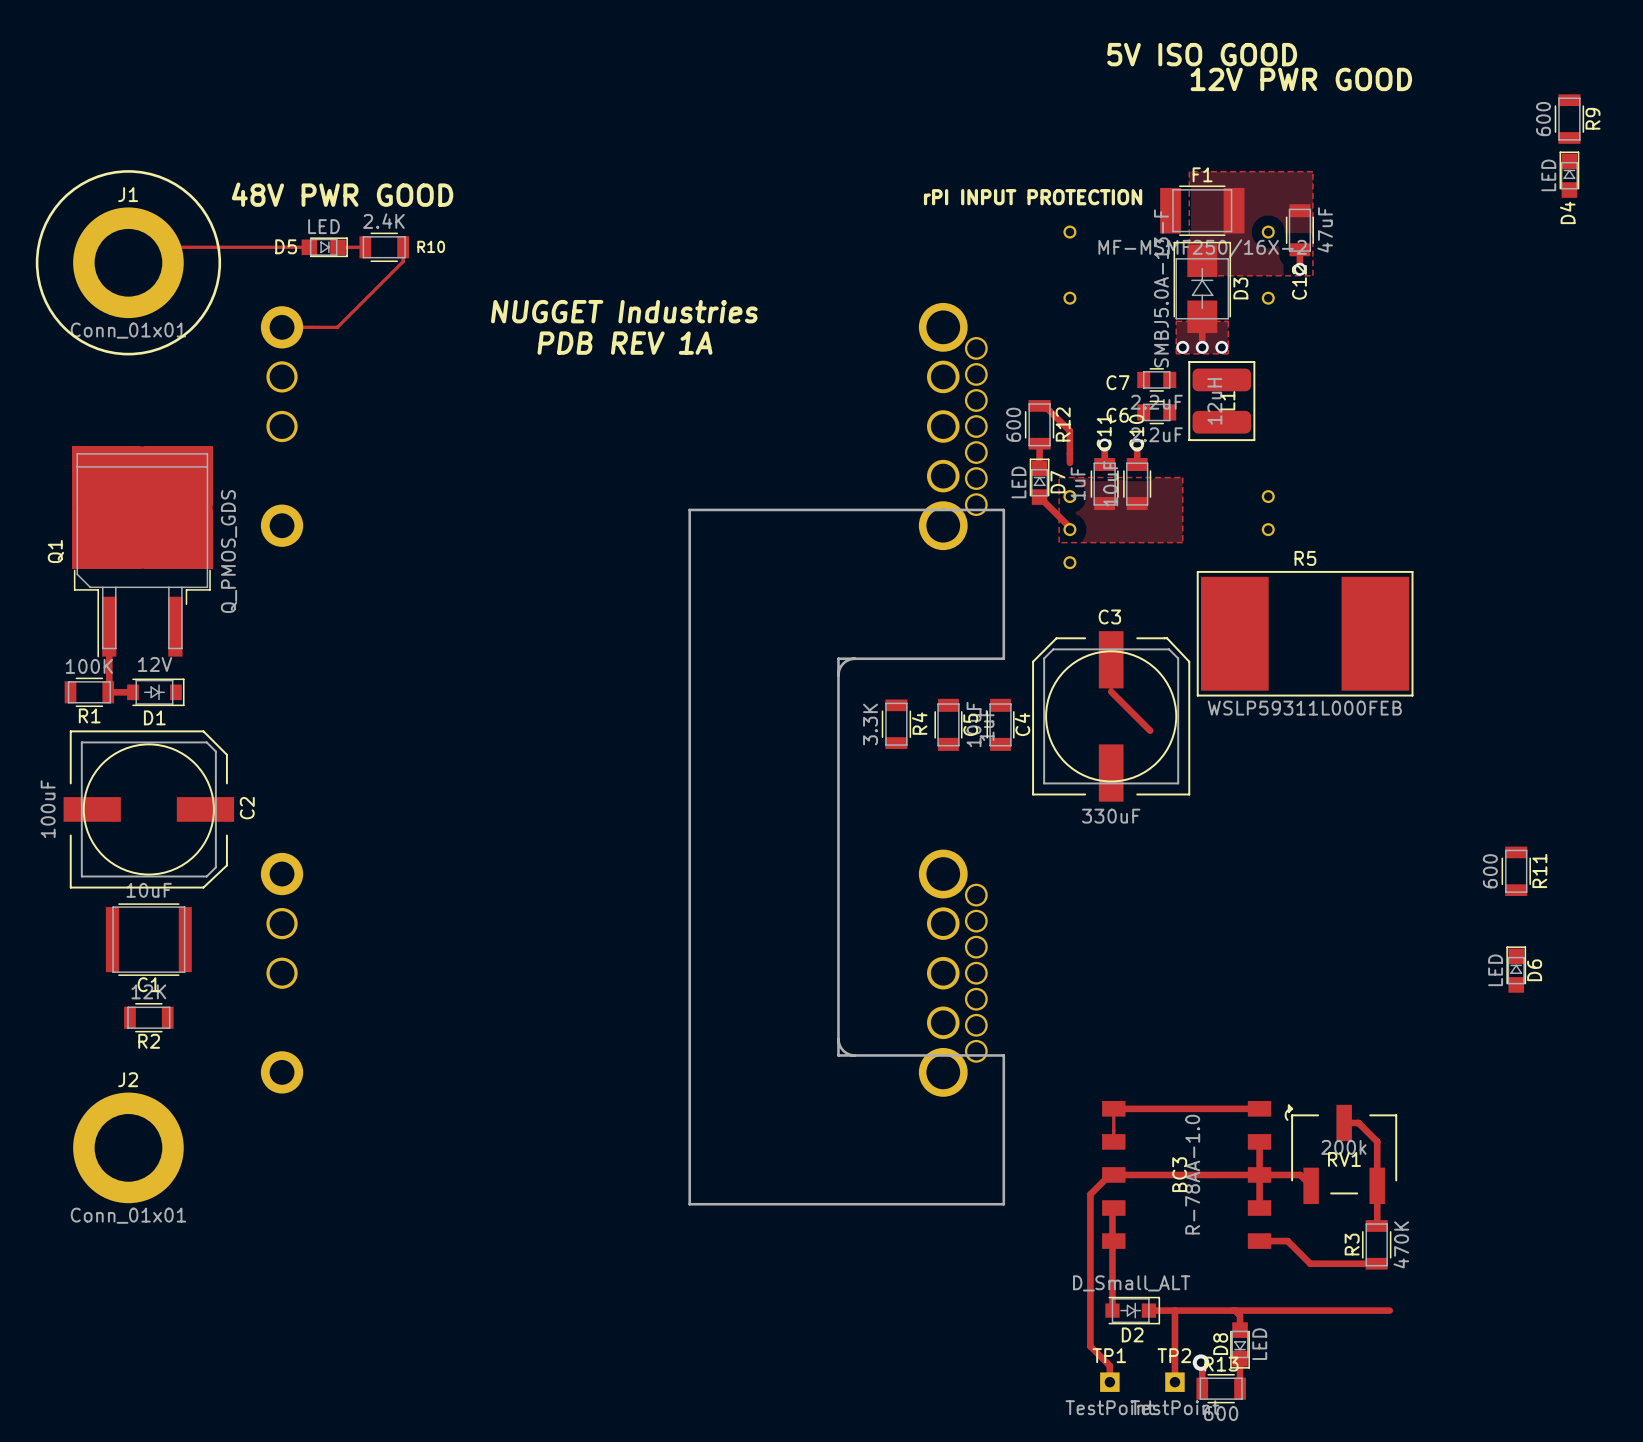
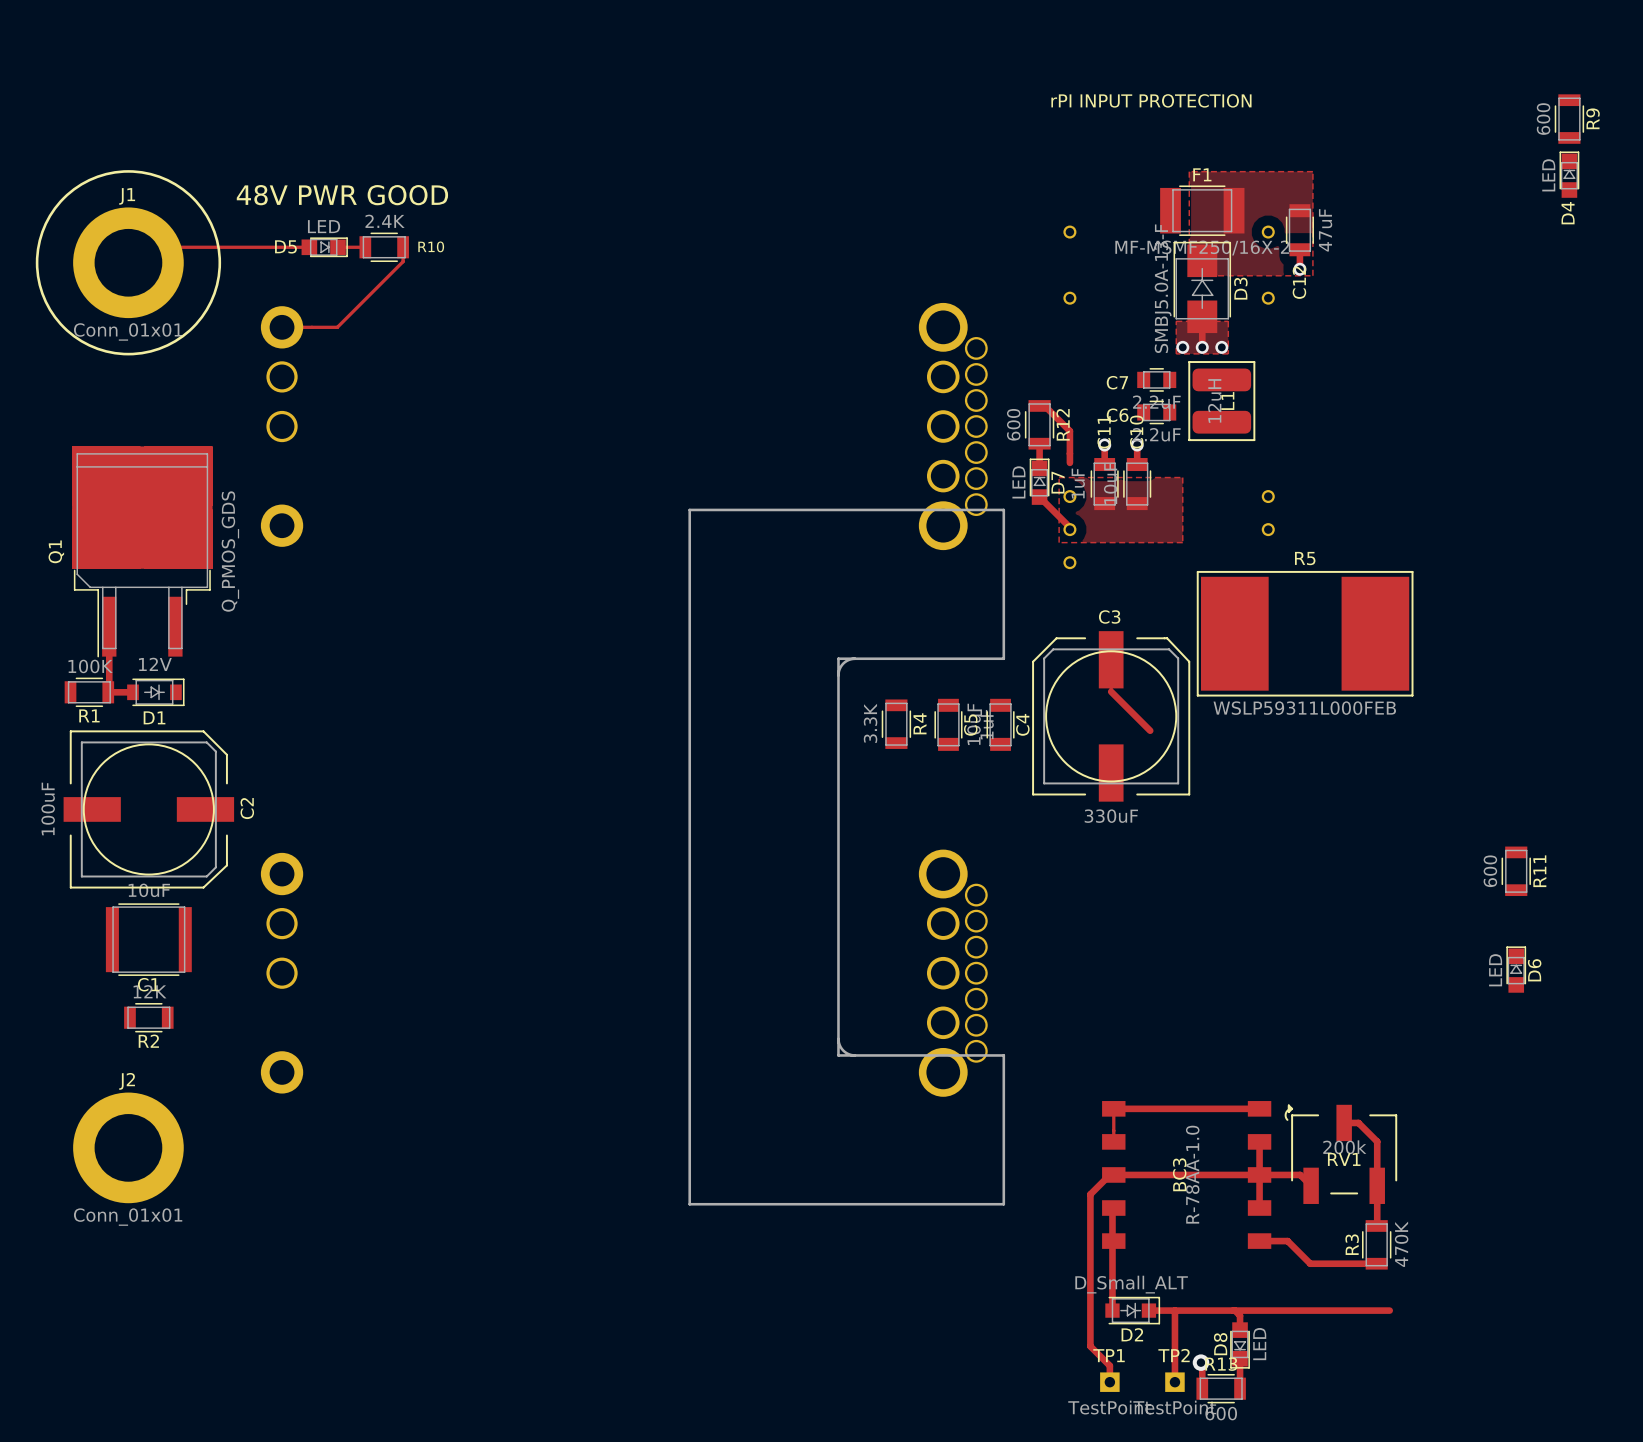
text: 5V ISO GOOD (1202, 54) -> none
text: 12V PWR GOOD (1301, 79) -> none
text position: rPI INPUT PROTECTION (1033, 197) -> rPI INPUT PROTECTION (1151, 100)
text: NUGGET Industries (624, 311) -> none
text: PDB REV 1A (624, 343) -> none

